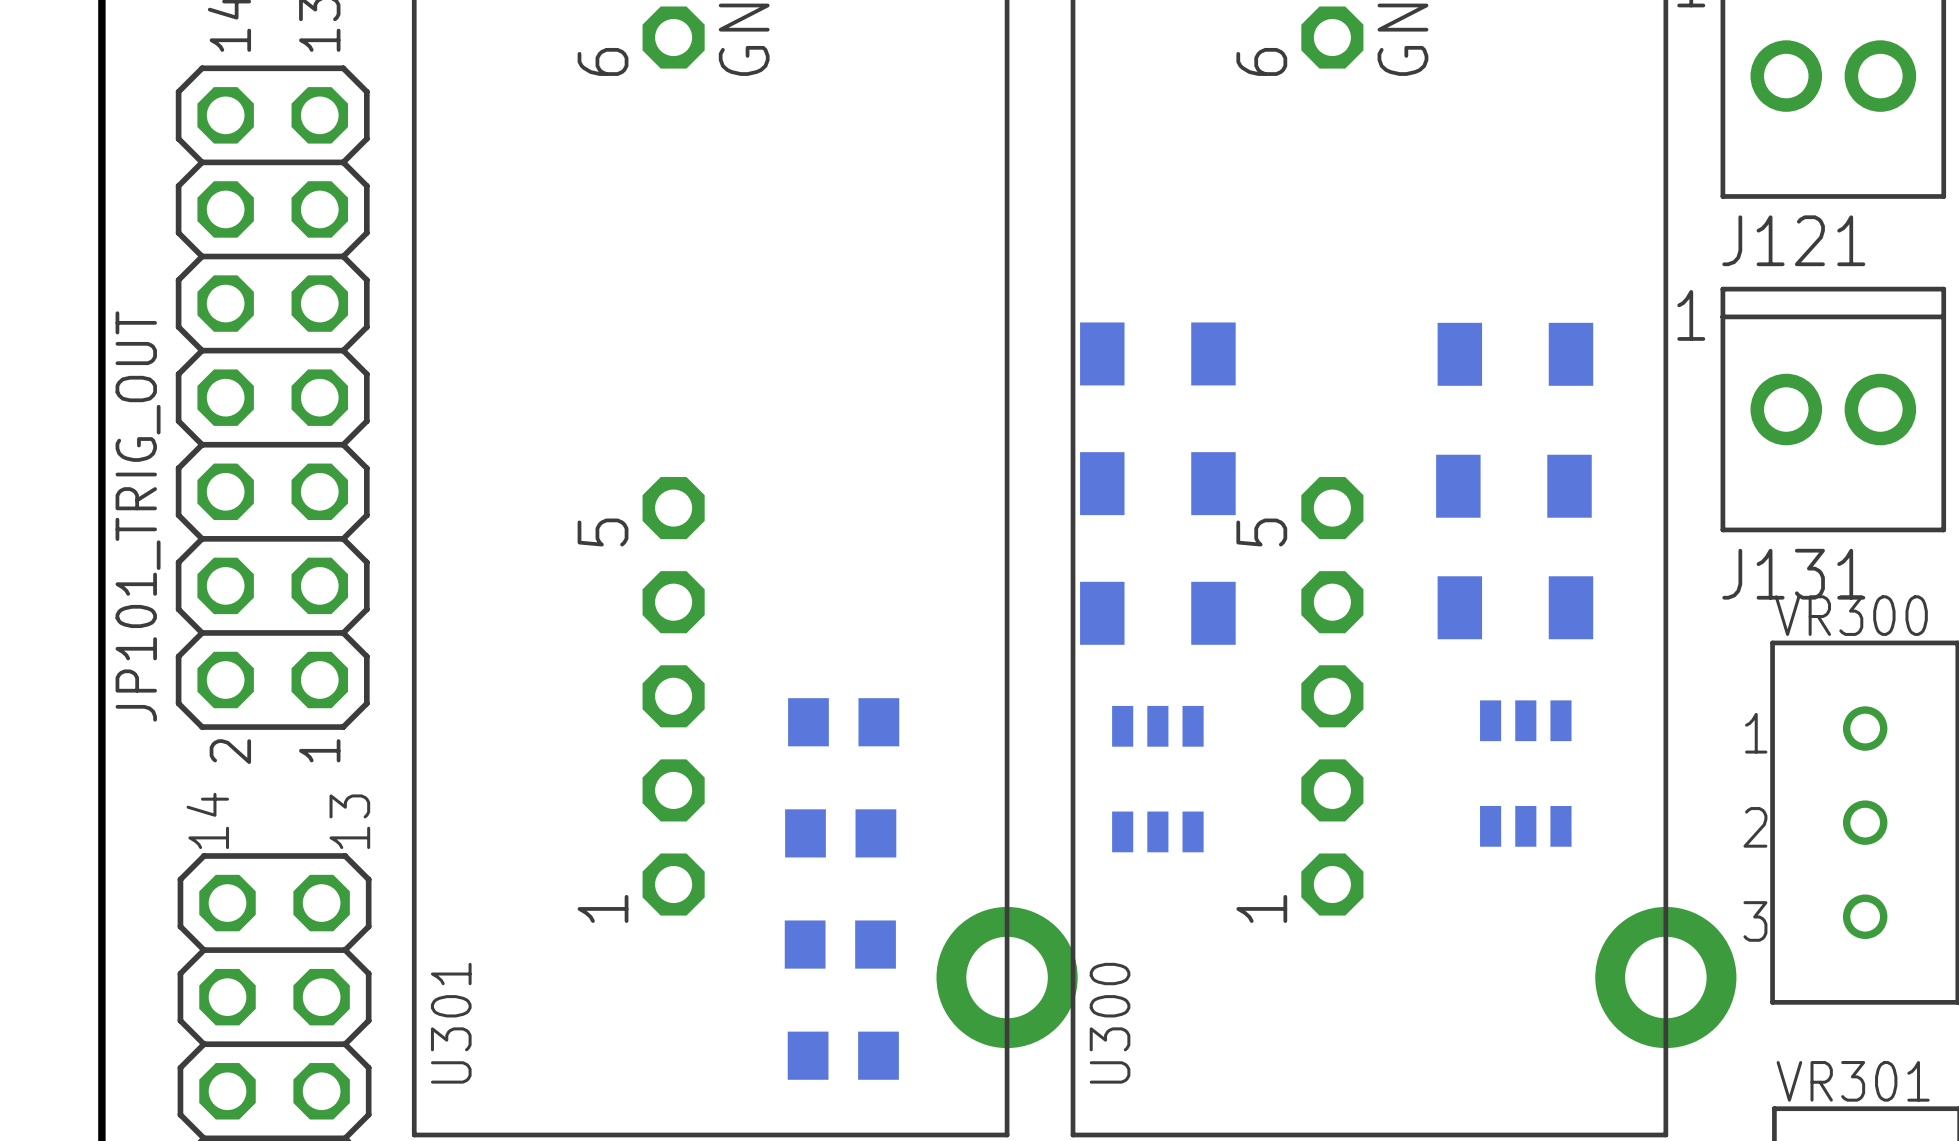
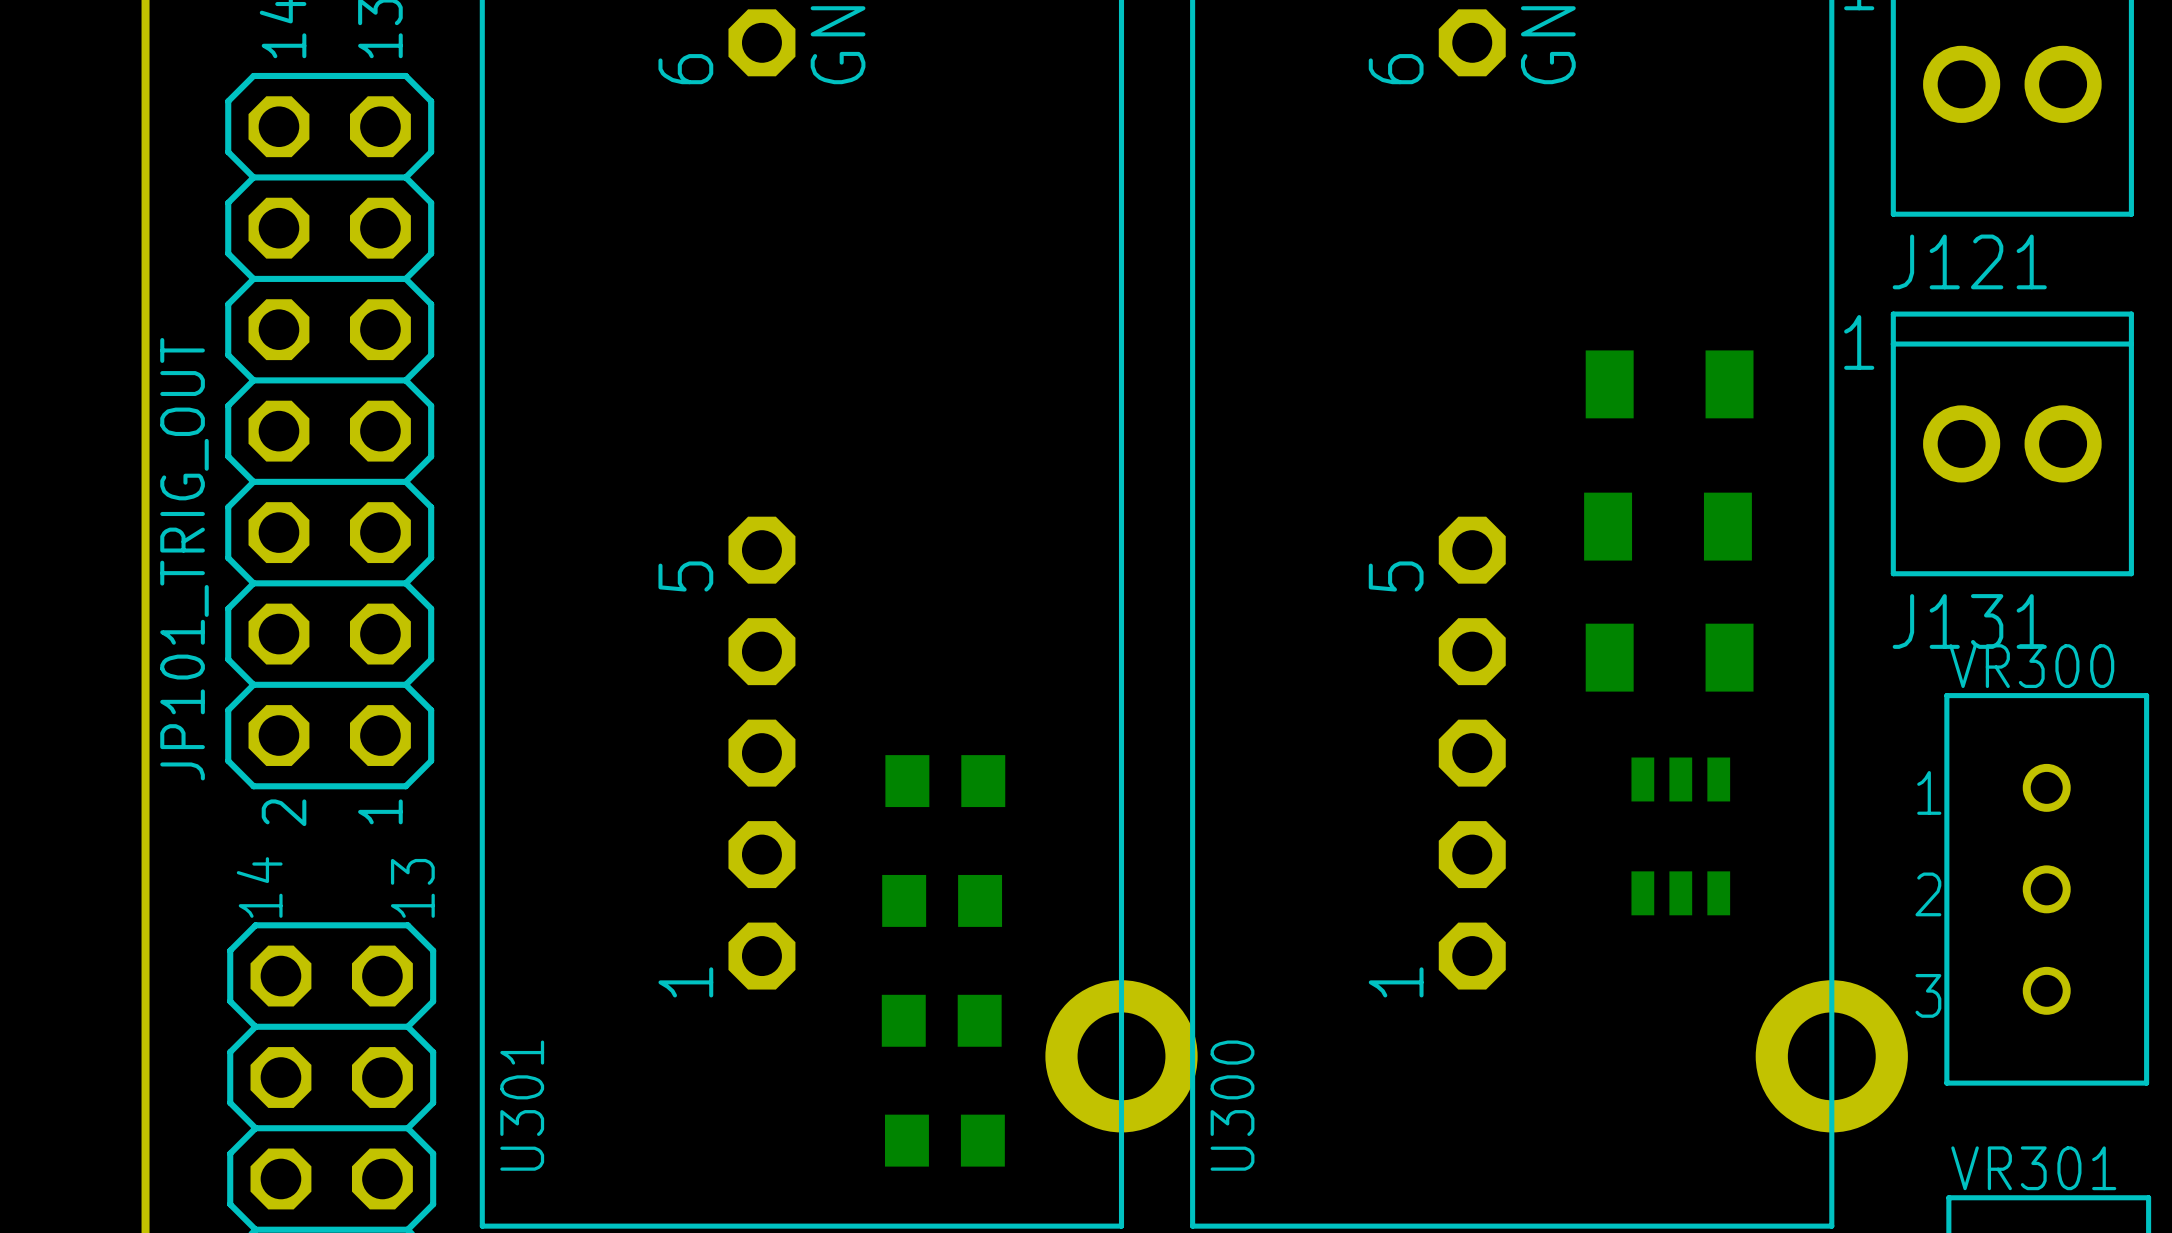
part: (1157, 353) -> none
part: (1157, 483) -> none
part: (1157, 613) -> none
part: (1157, 779) -> none

